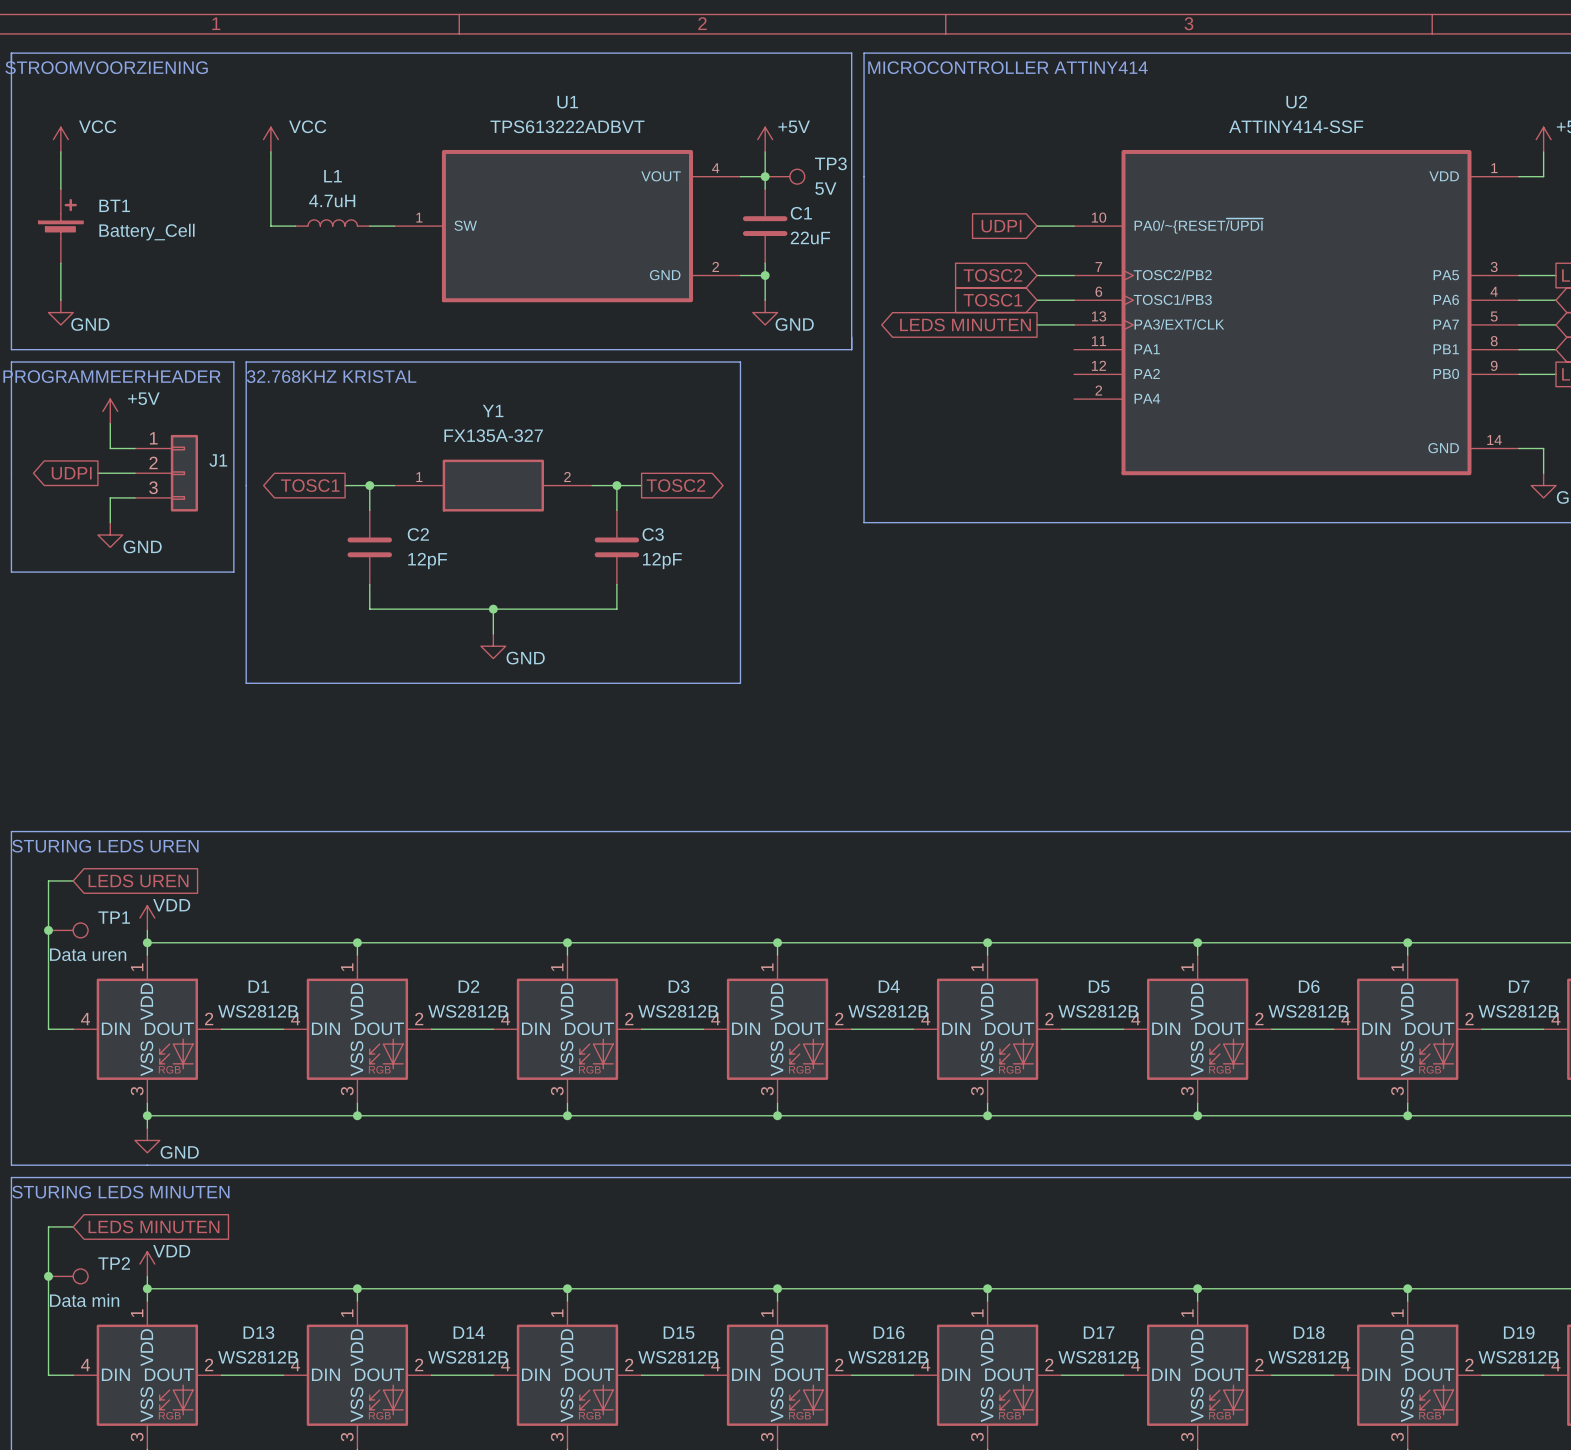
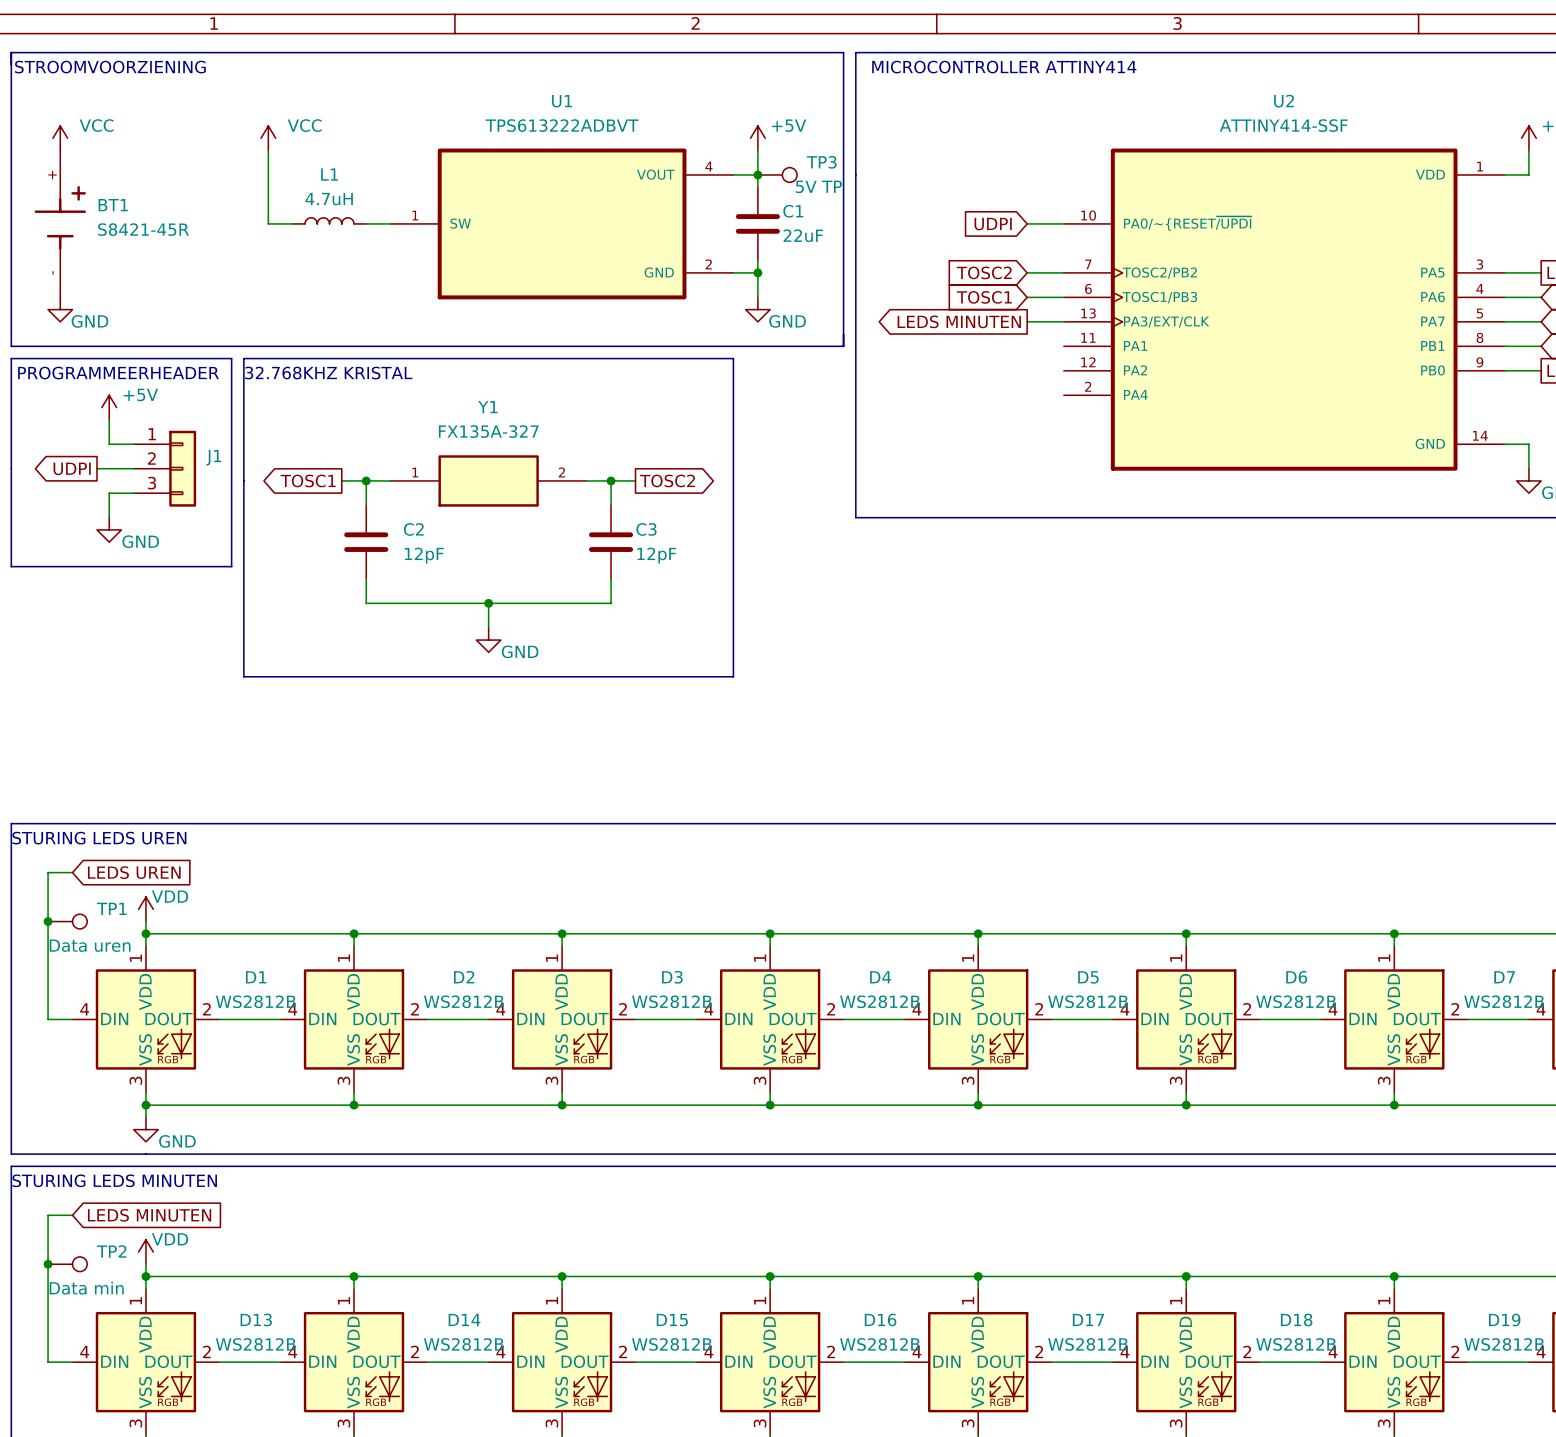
TP3 value: 5V (825, 188) -> 5V TP (818, 186)
BT1 symbol: [38, 189, 84, 264] -> [34, 150, 86, 298]
BT1 value: Battery_Cell (146, 232) -> S8421-45R (143, 229)

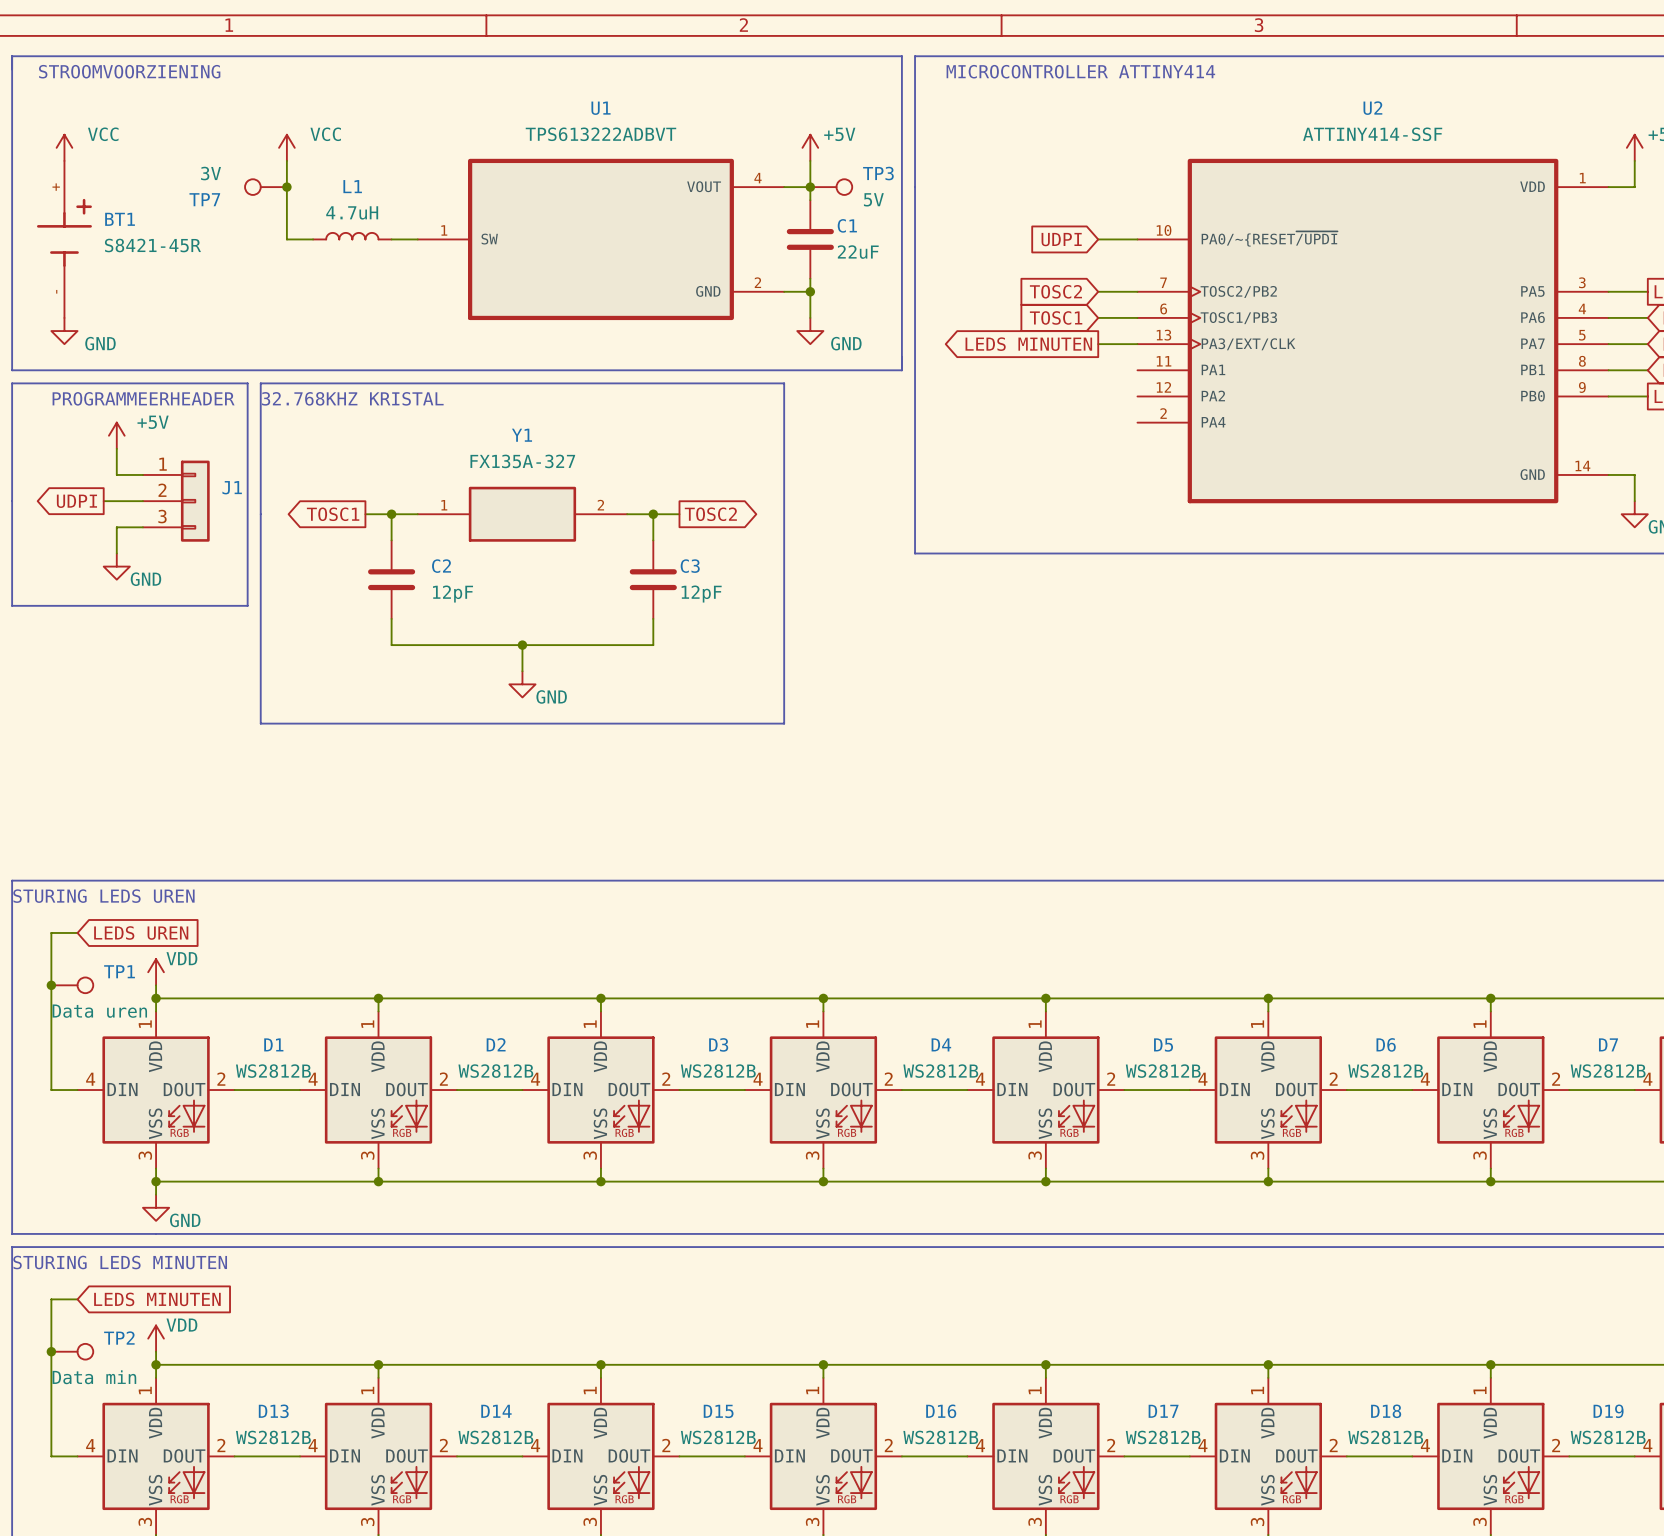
TP7: none -> 3V (265, 187)
junction: none -> (286, 187)
TP3 value: 5V TP (818, 186) -> 5V (873, 199)

